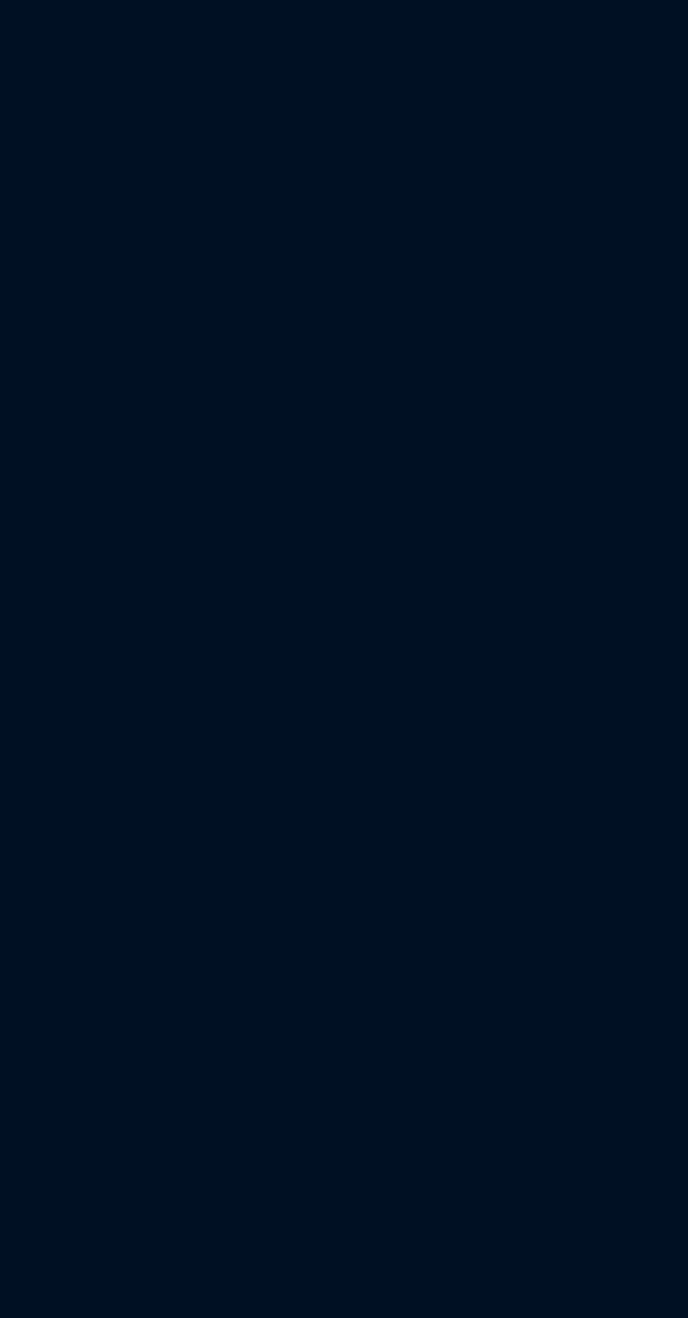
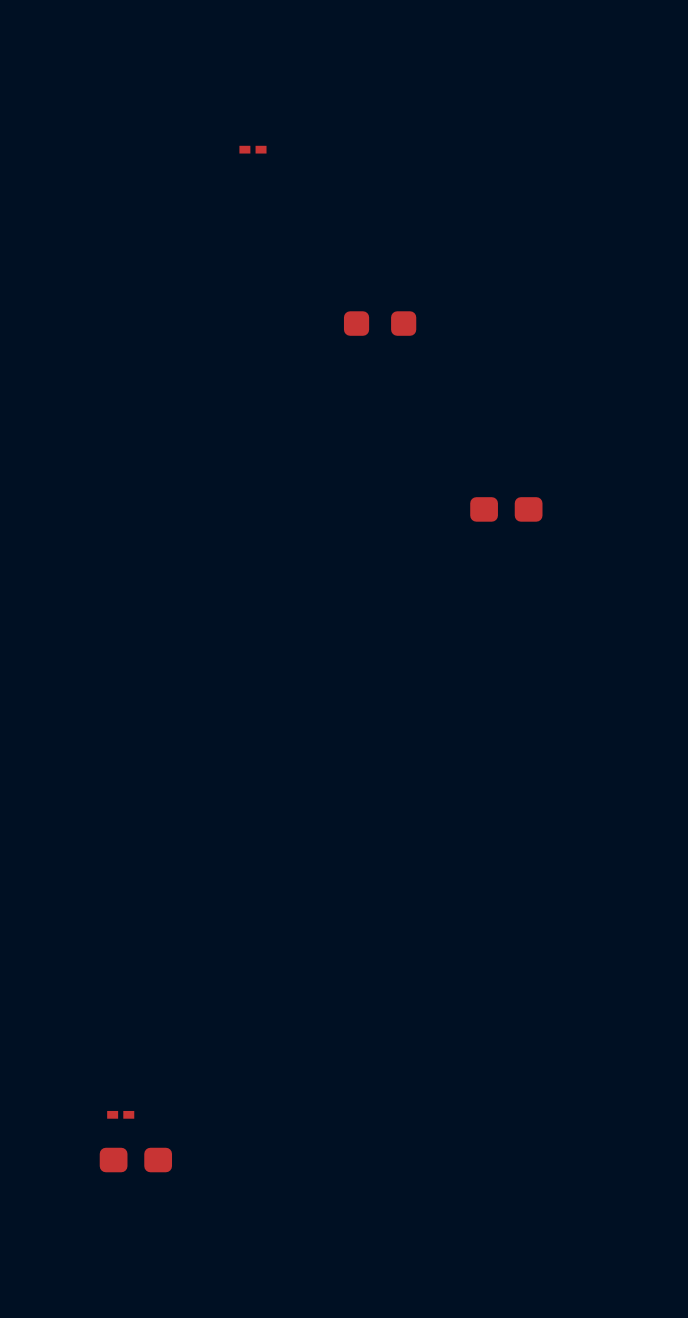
part: none -> (252, 149)
part: none -> (380, 323)
part: none -> (506, 509)
part: none -> (120, 1114)
part: none -> (135, 1160)

